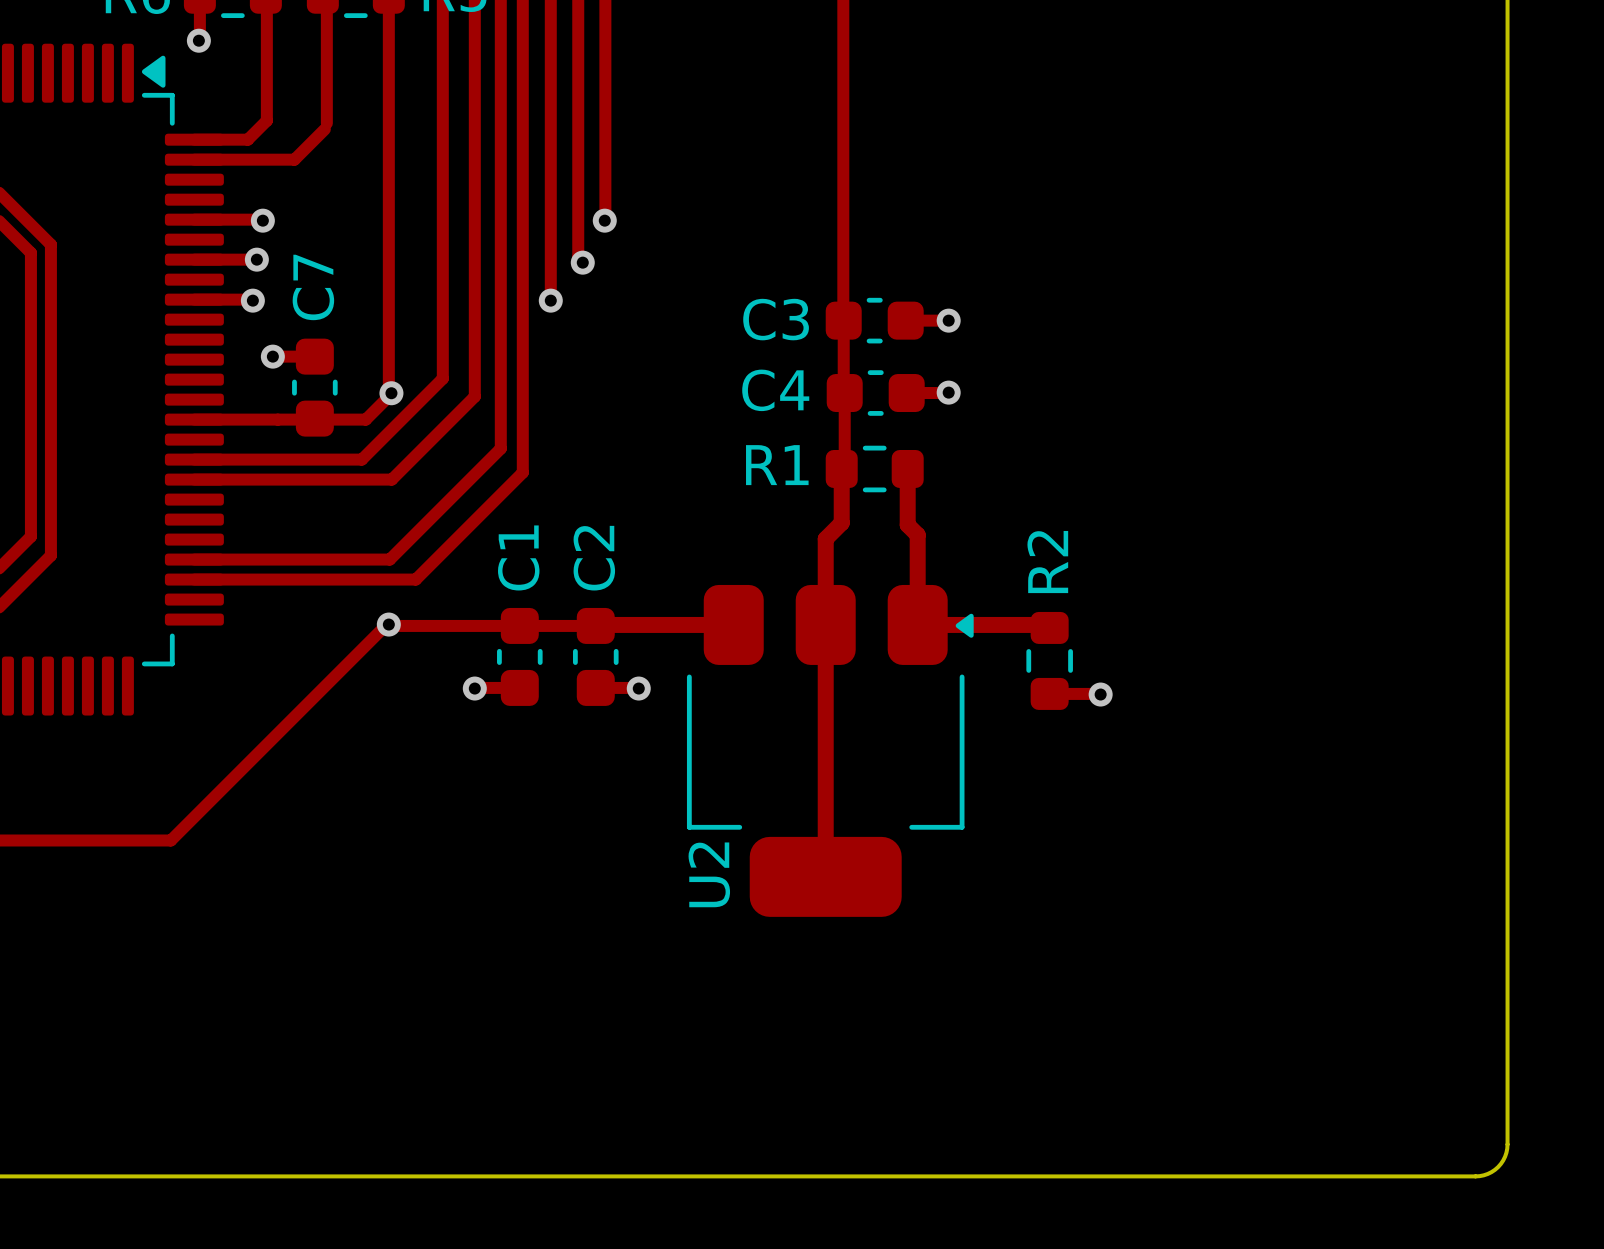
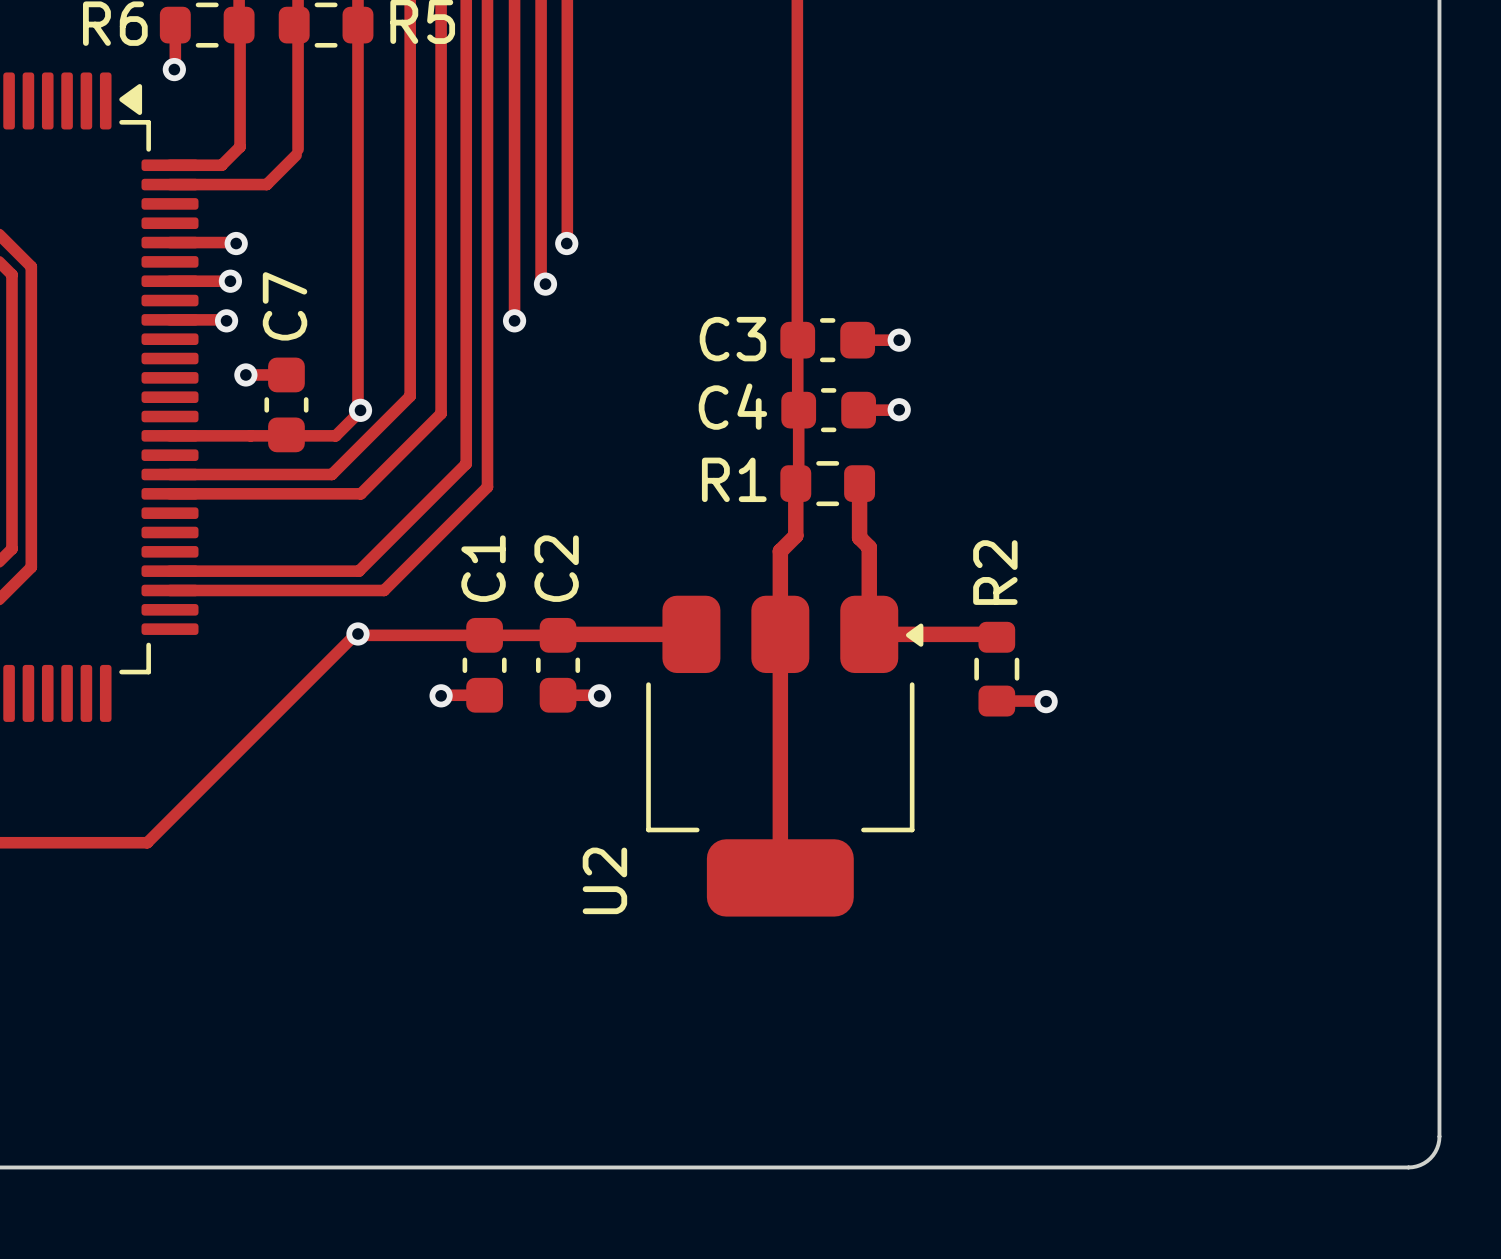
U2 name position: U2 (709, 874) -> U2 (604, 880)

